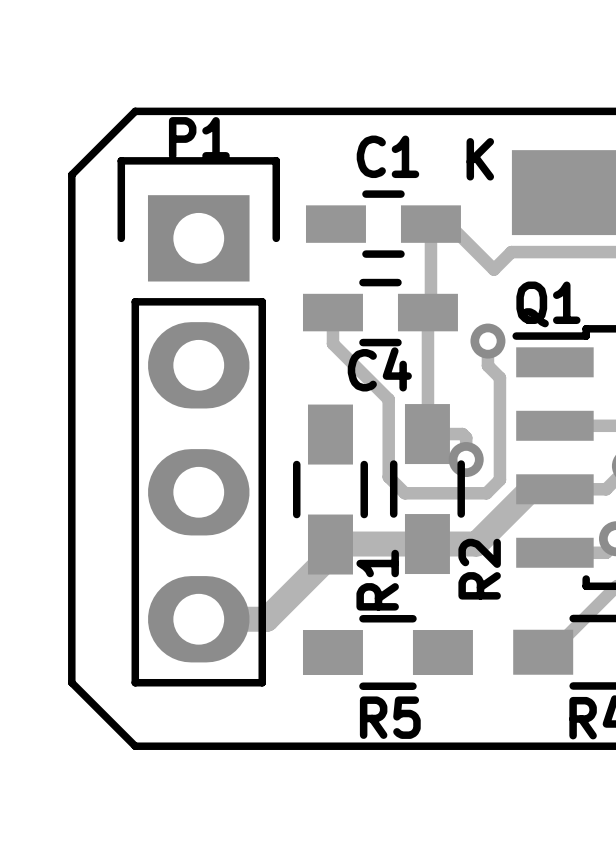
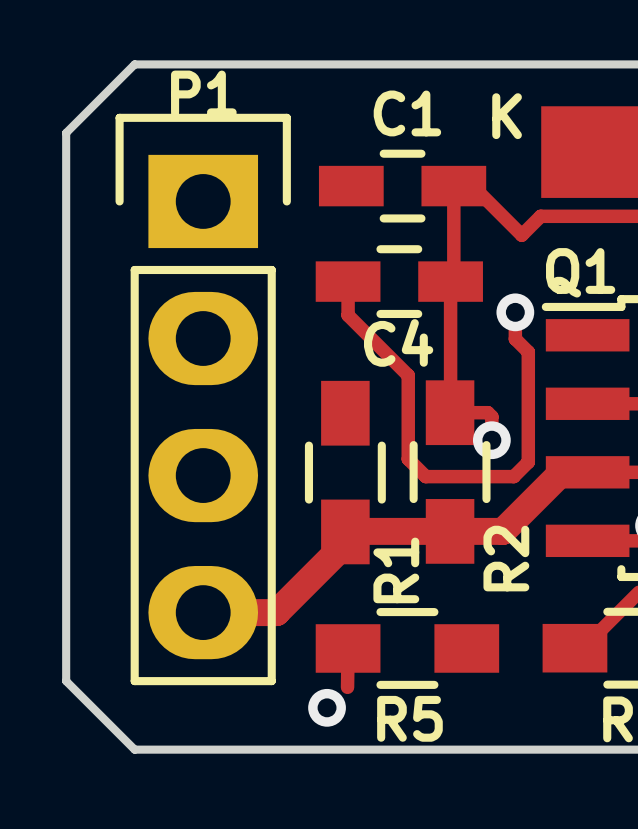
track: none -> (348, 648) (347, 687)
via: none -> (327, 707)

